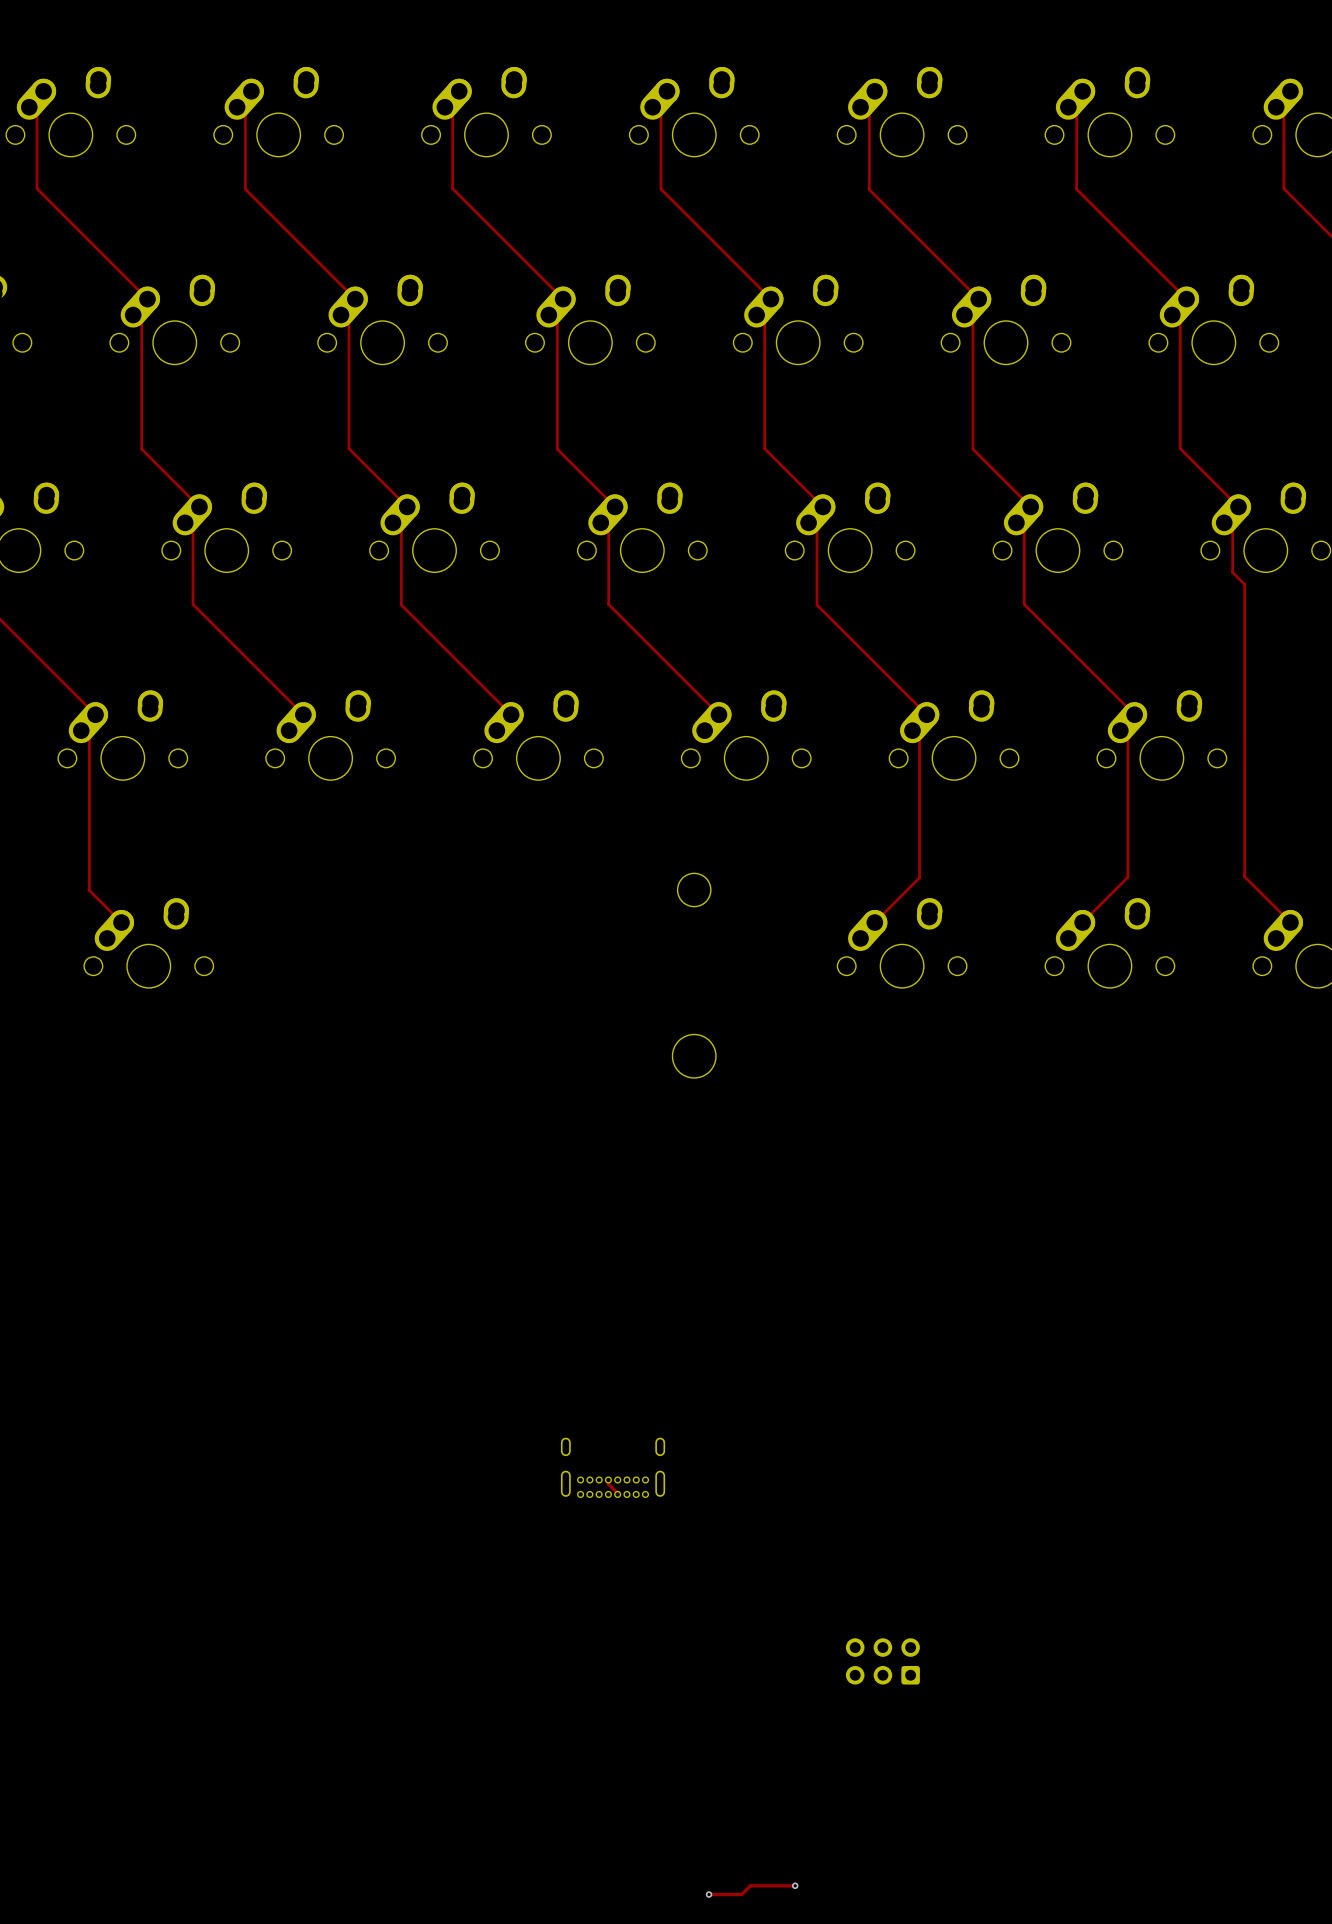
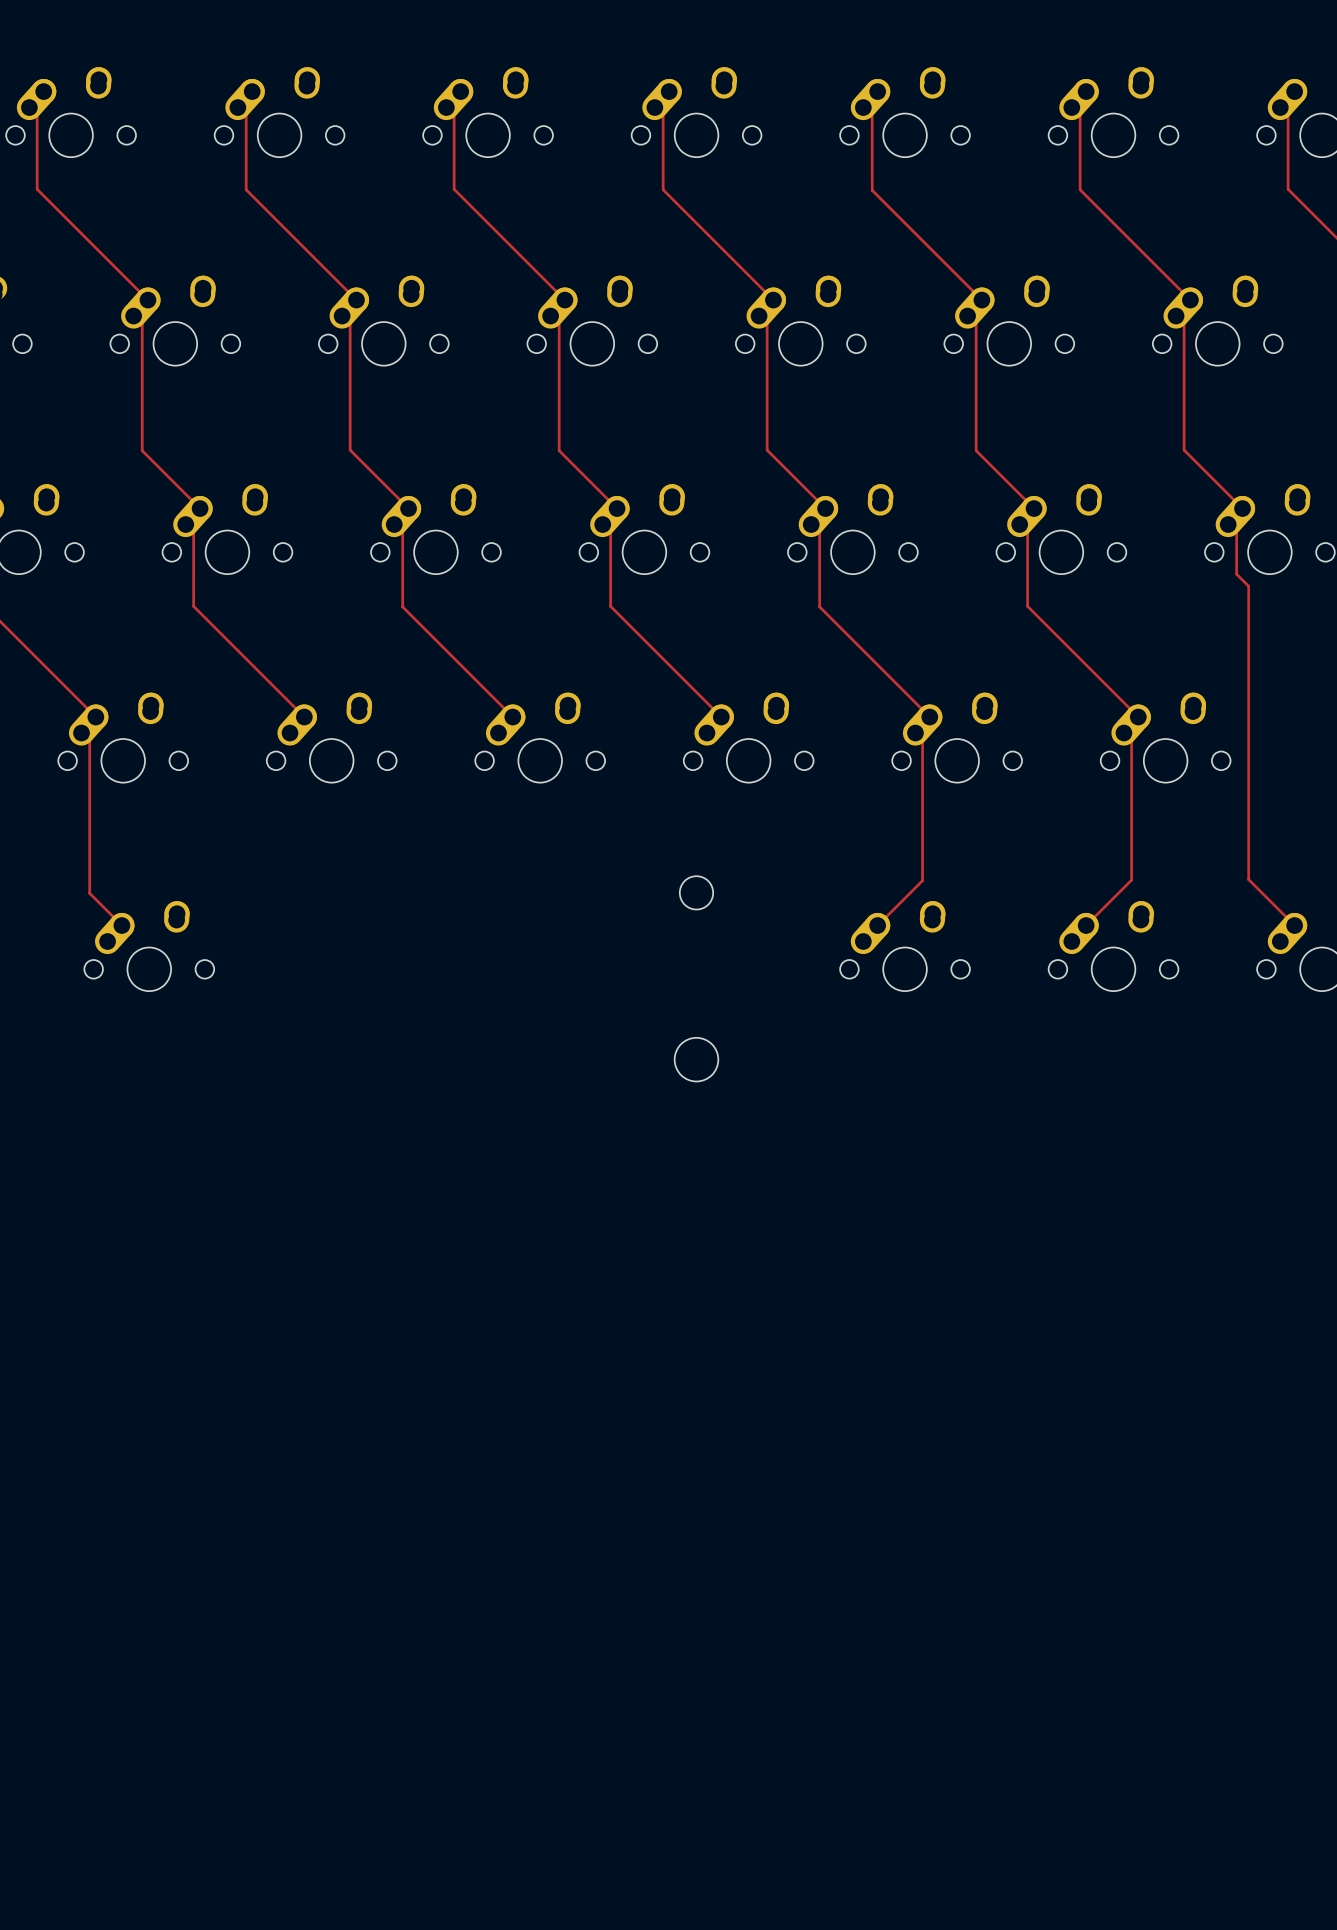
part: (613, 1467) -> none
track: (608, 1479) (608, 1483) (617, 1494) -> none
part: (882, 1661) -> none
track: (795, 1885) (750, 1885) (741, 1894) (709, 1894) -> none
via: (795, 1885) -> none
via: (709, 1894) -> none

